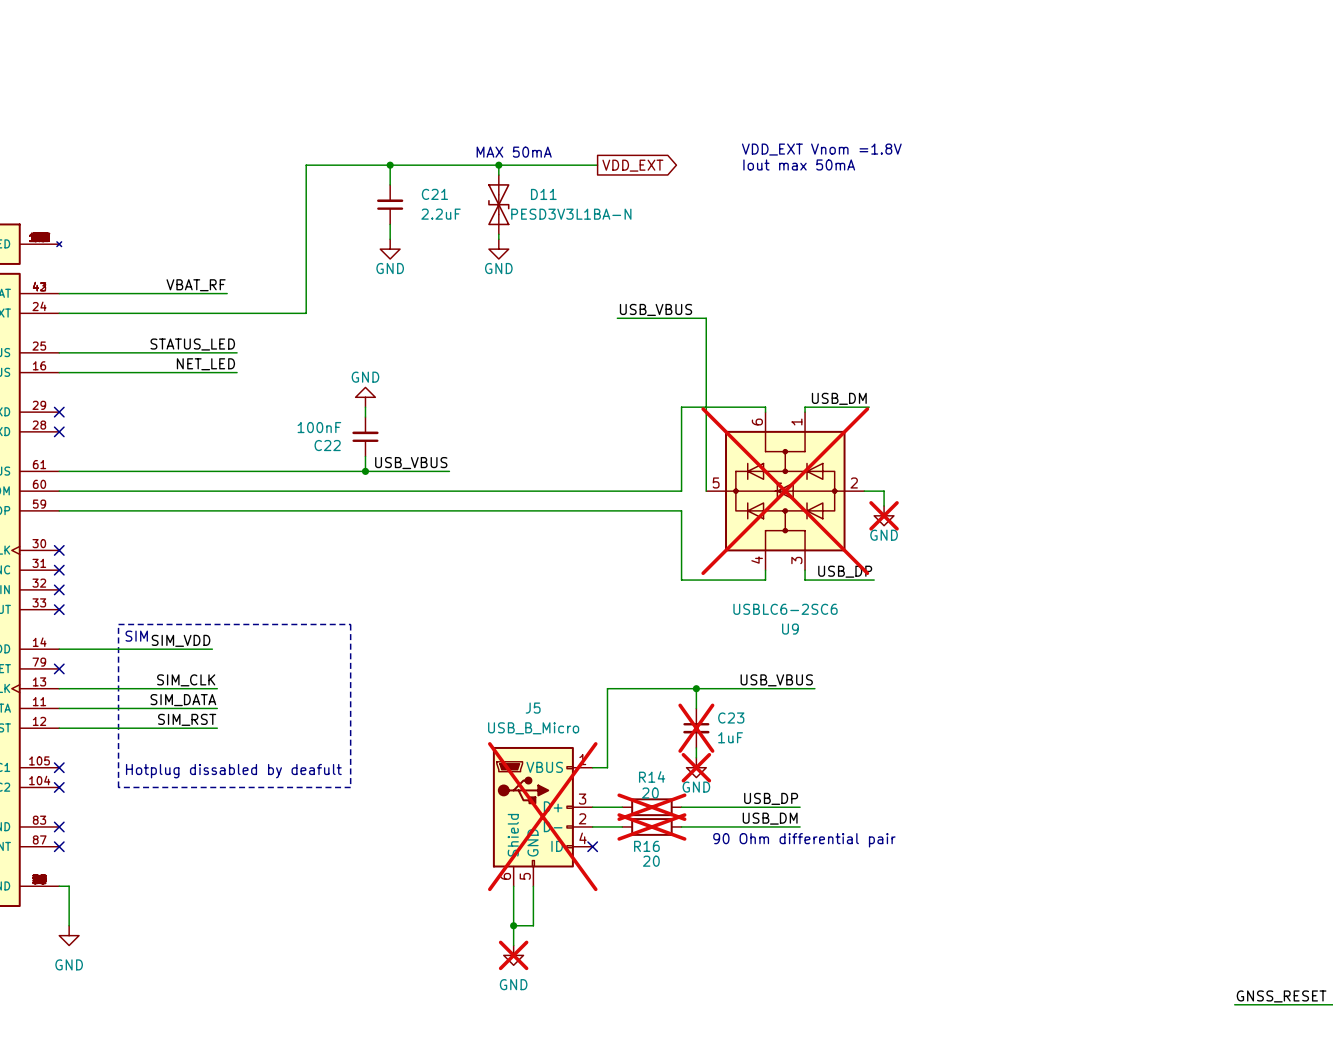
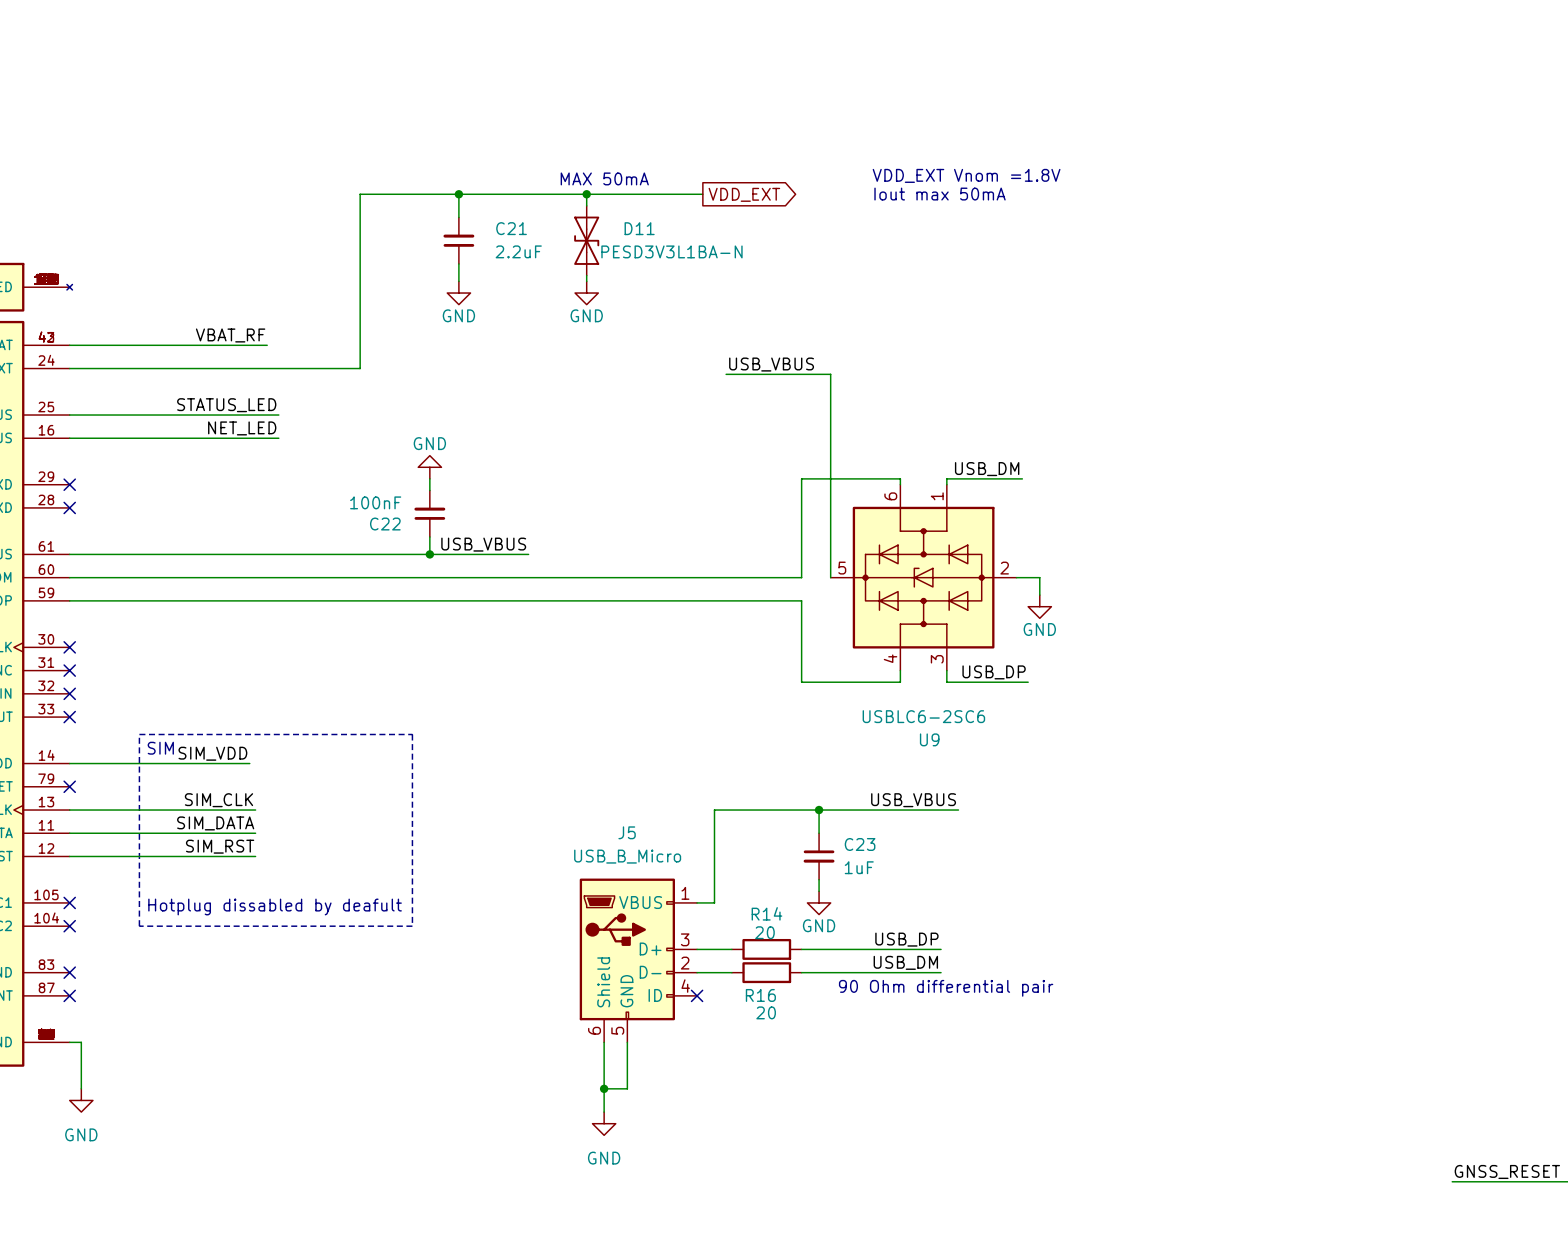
U9 do-not-place cross: (785, 491) -> none
power symbol do-not-place cross: (884, 515) -> none
C23 do-not-place cross: (696, 728) -> none
power symbol do-not-place cross: (696, 767) -> none
R14 do-not-place cross: (651, 807) -> none
J5 do-not-place cross: (542, 816) -> none
R16 do-not-place cross: (651, 826) -> none
power symbol do-not-place cross: (513, 955) -> none

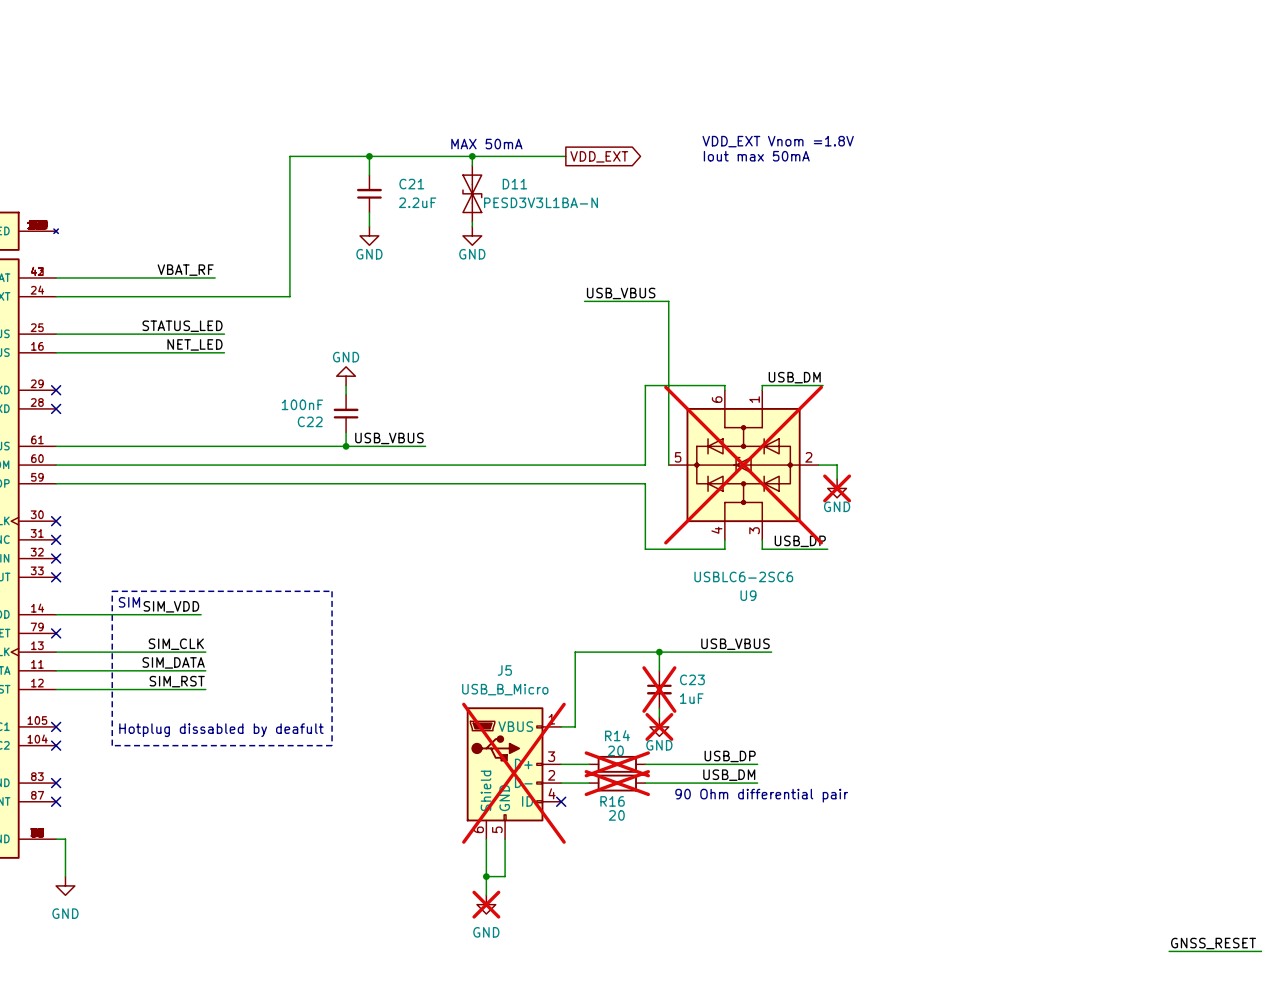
U9 do-not-place cross: none -> (743, 465)
power symbol do-not-place cross: none -> (837, 488)
C23 do-not-place cross: none -> (659, 689)
power symbol do-not-place cross: none -> (659, 726)
R14 do-not-place cross: none -> (617, 764)
J5 do-not-place cross: none -> (513, 773)
R16 do-not-place cross: none -> (617, 783)
power symbol do-not-place cross: none -> (486, 904)

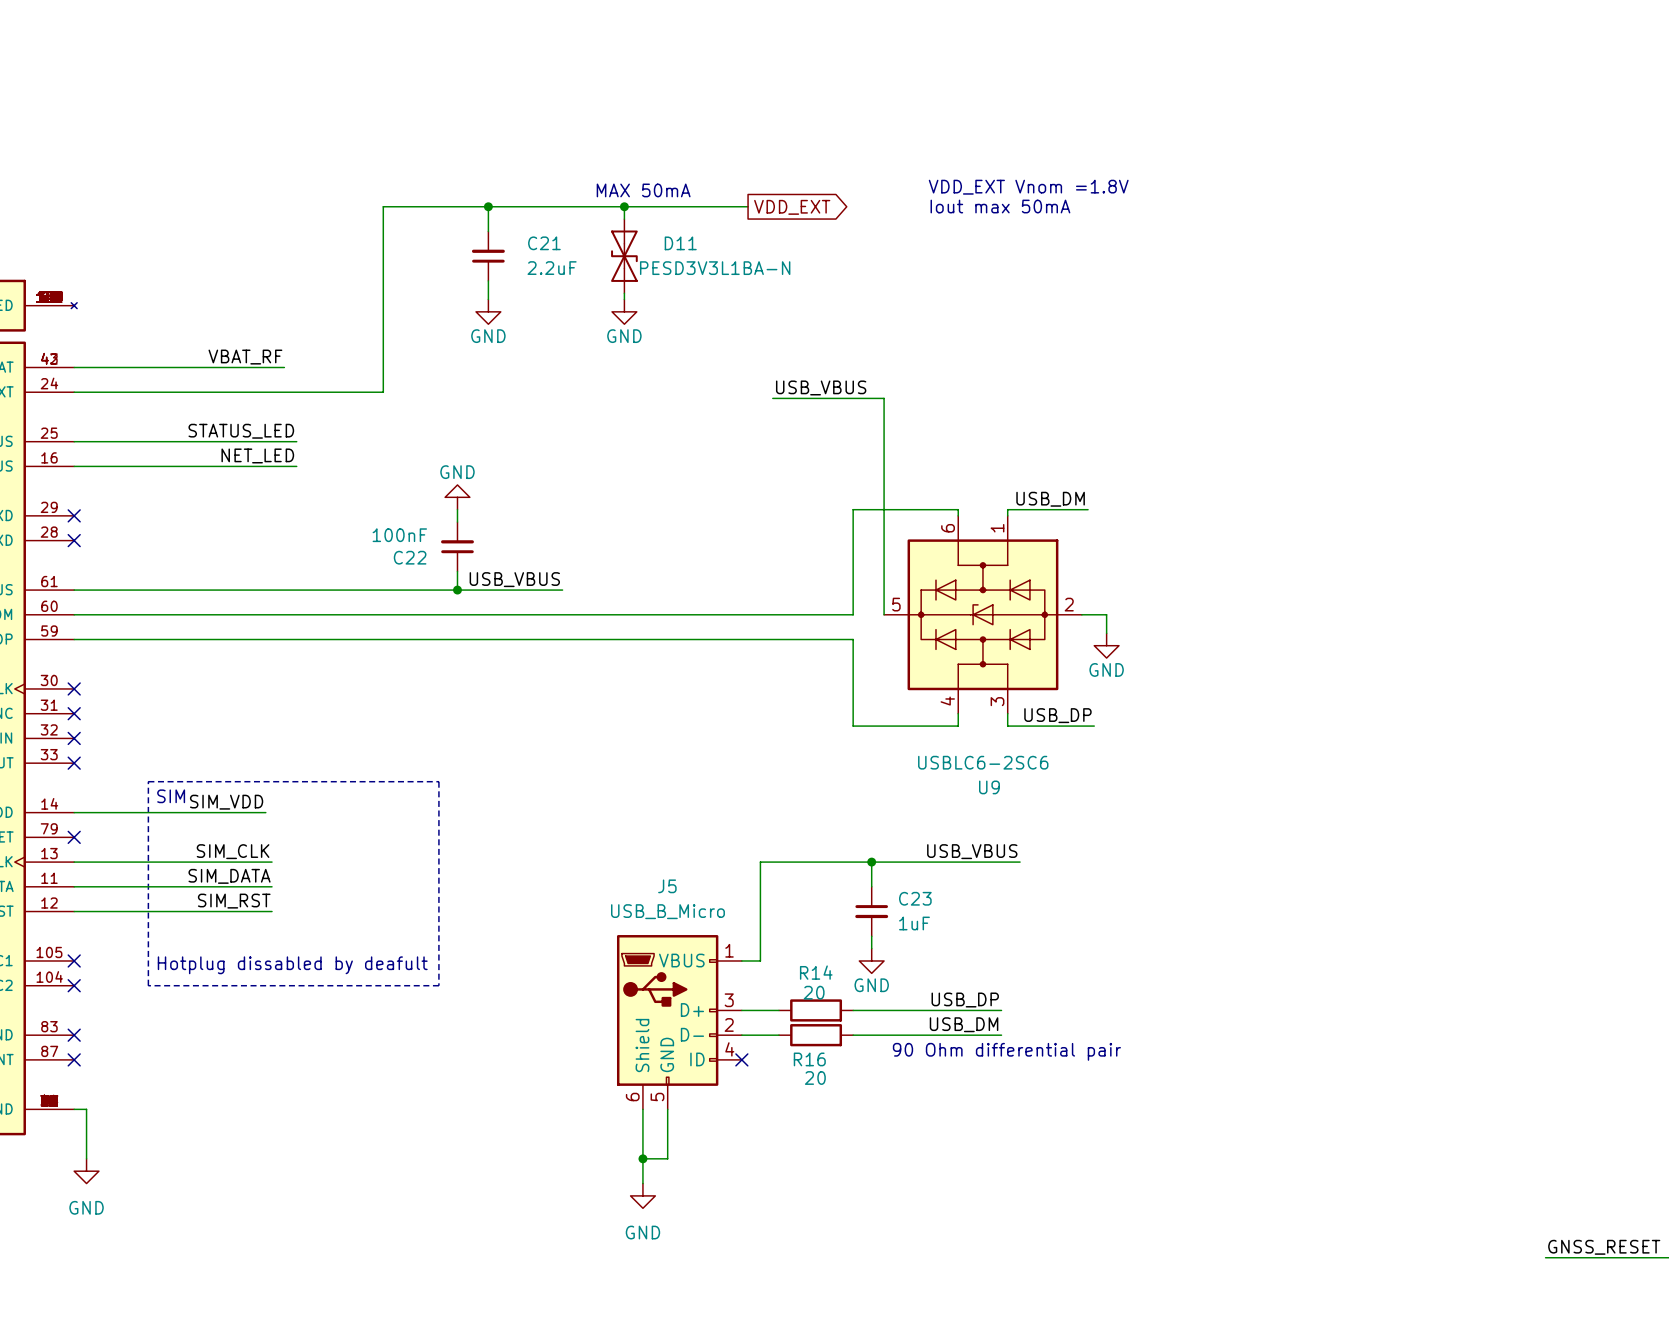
U9 do-not-place cross: (743, 465) -> none
power symbol do-not-place cross: (837, 488) -> none
C23 do-not-place cross: (659, 689) -> none
power symbol do-not-place cross: (659, 726) -> none
R14 do-not-place cross: (617, 764) -> none
J5 do-not-place cross: (513, 773) -> none
R16 do-not-place cross: (617, 783) -> none
power symbol do-not-place cross: (486, 904) -> none

